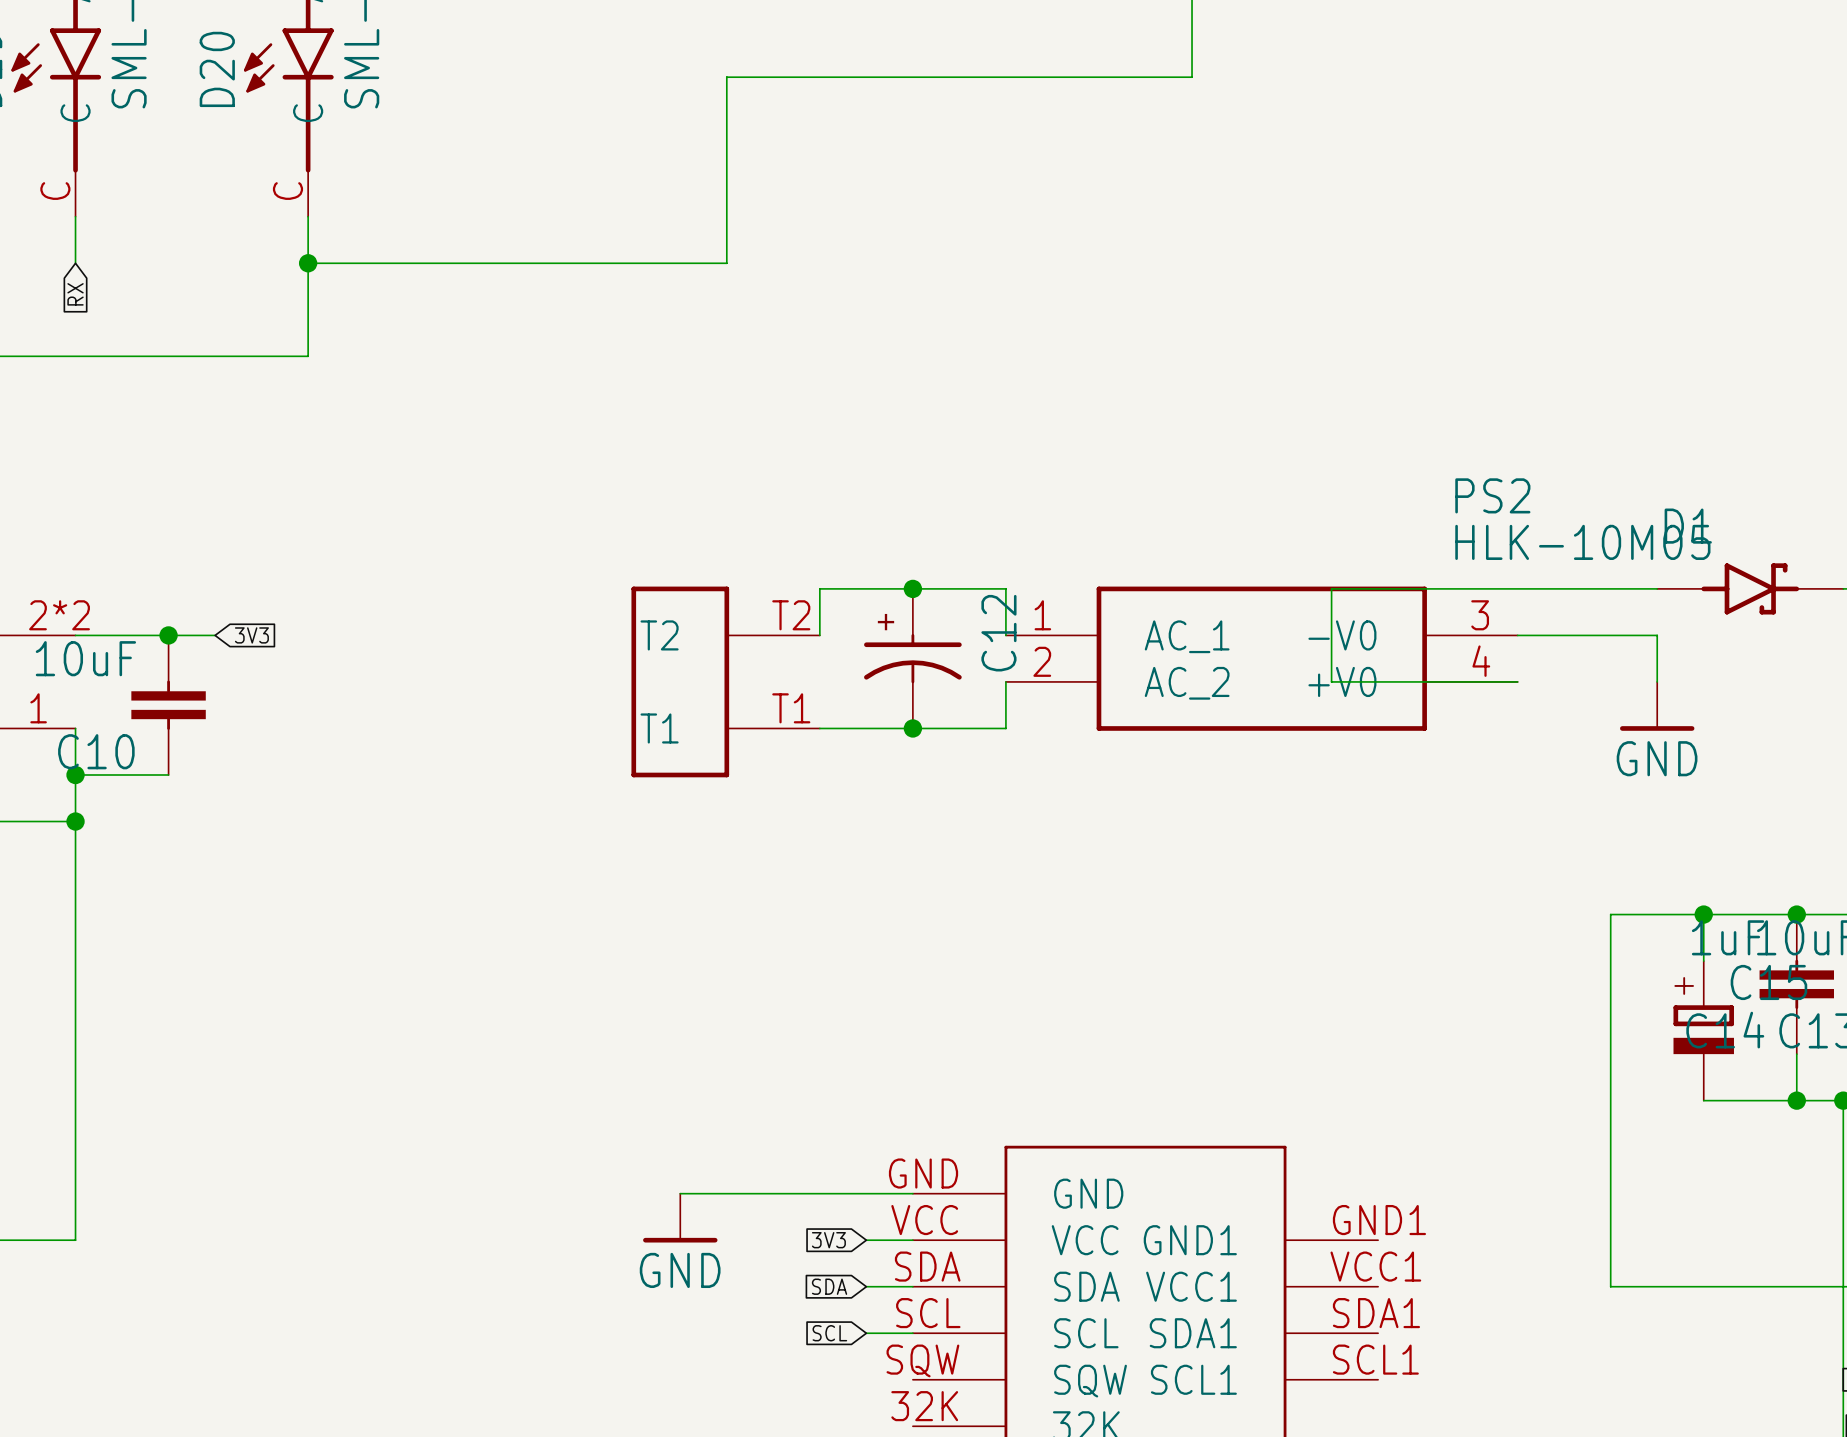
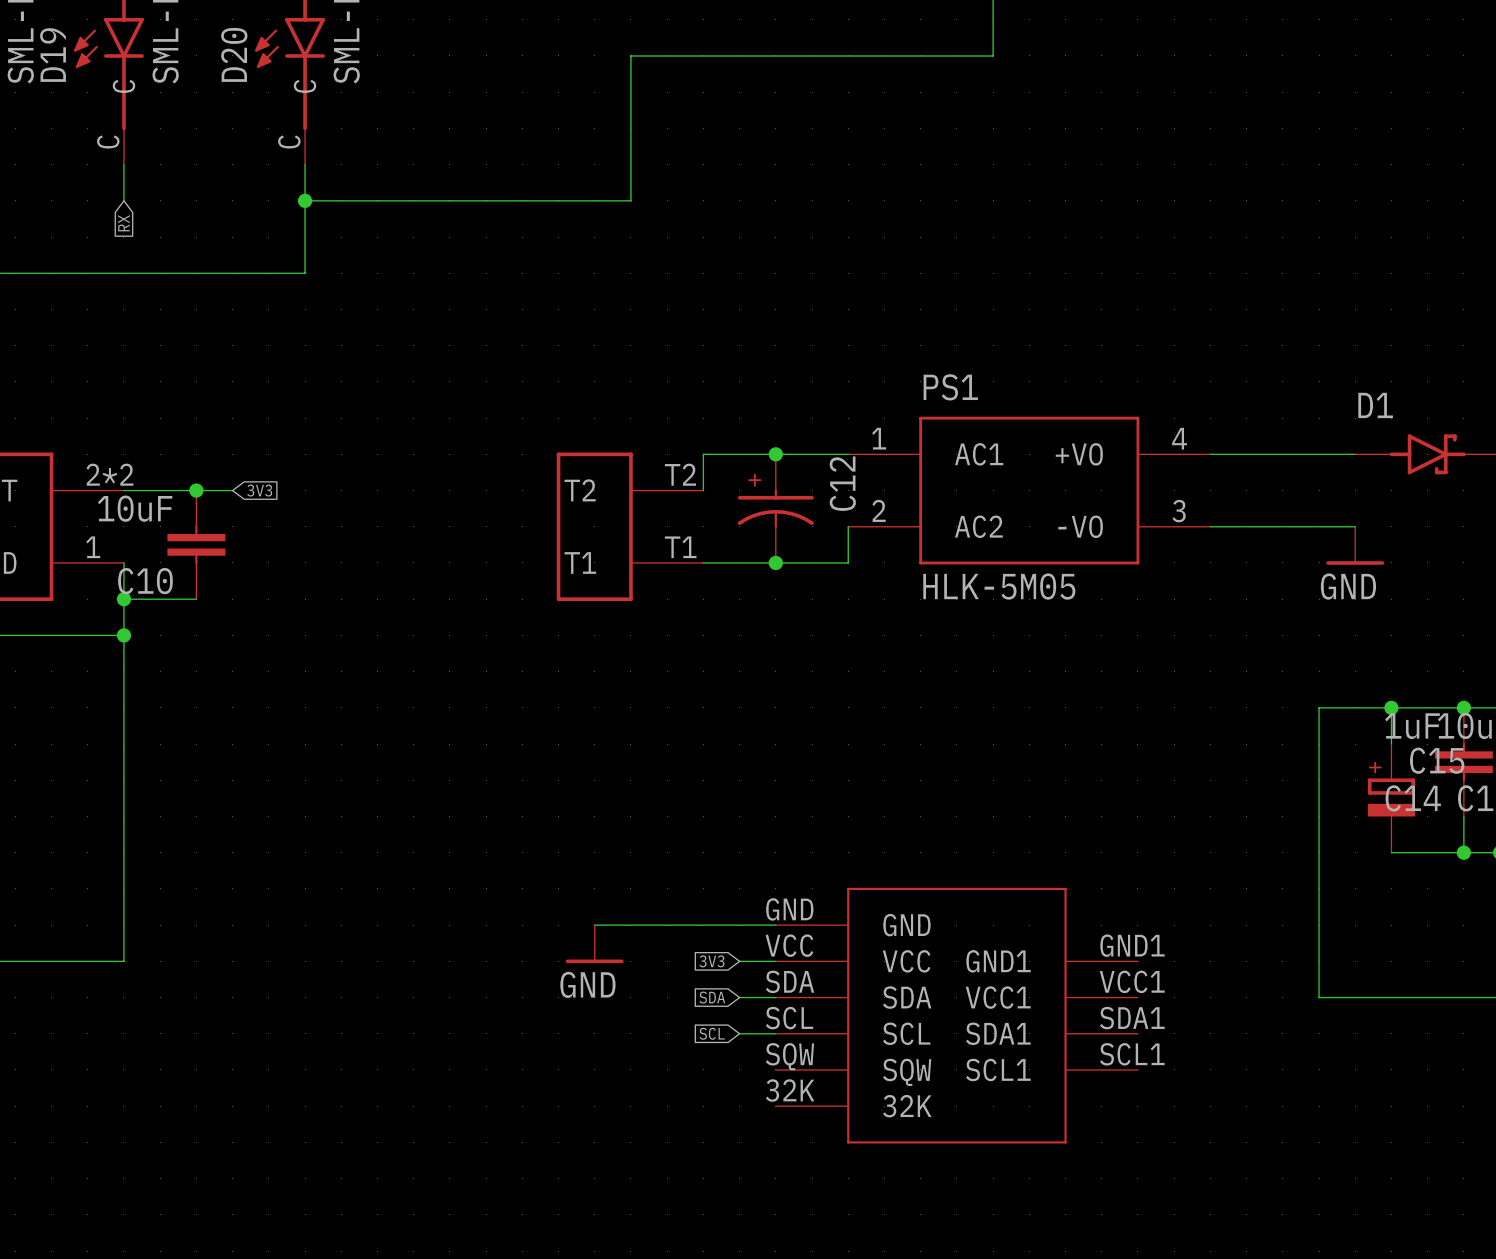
wire: (1005, 588) (1005, 635) -> none
wire: (1471, 588) (1331, 588) (1331, 681) (1471, 681) -> none
PS1: none -> HLK-5M05 (1029, 490)
wire: (1517, 635) (1657, 635) (1657, 681) -> (1246, 526) (1355, 526)
PS2: HLK-10M05 (1261, 658) -> none

